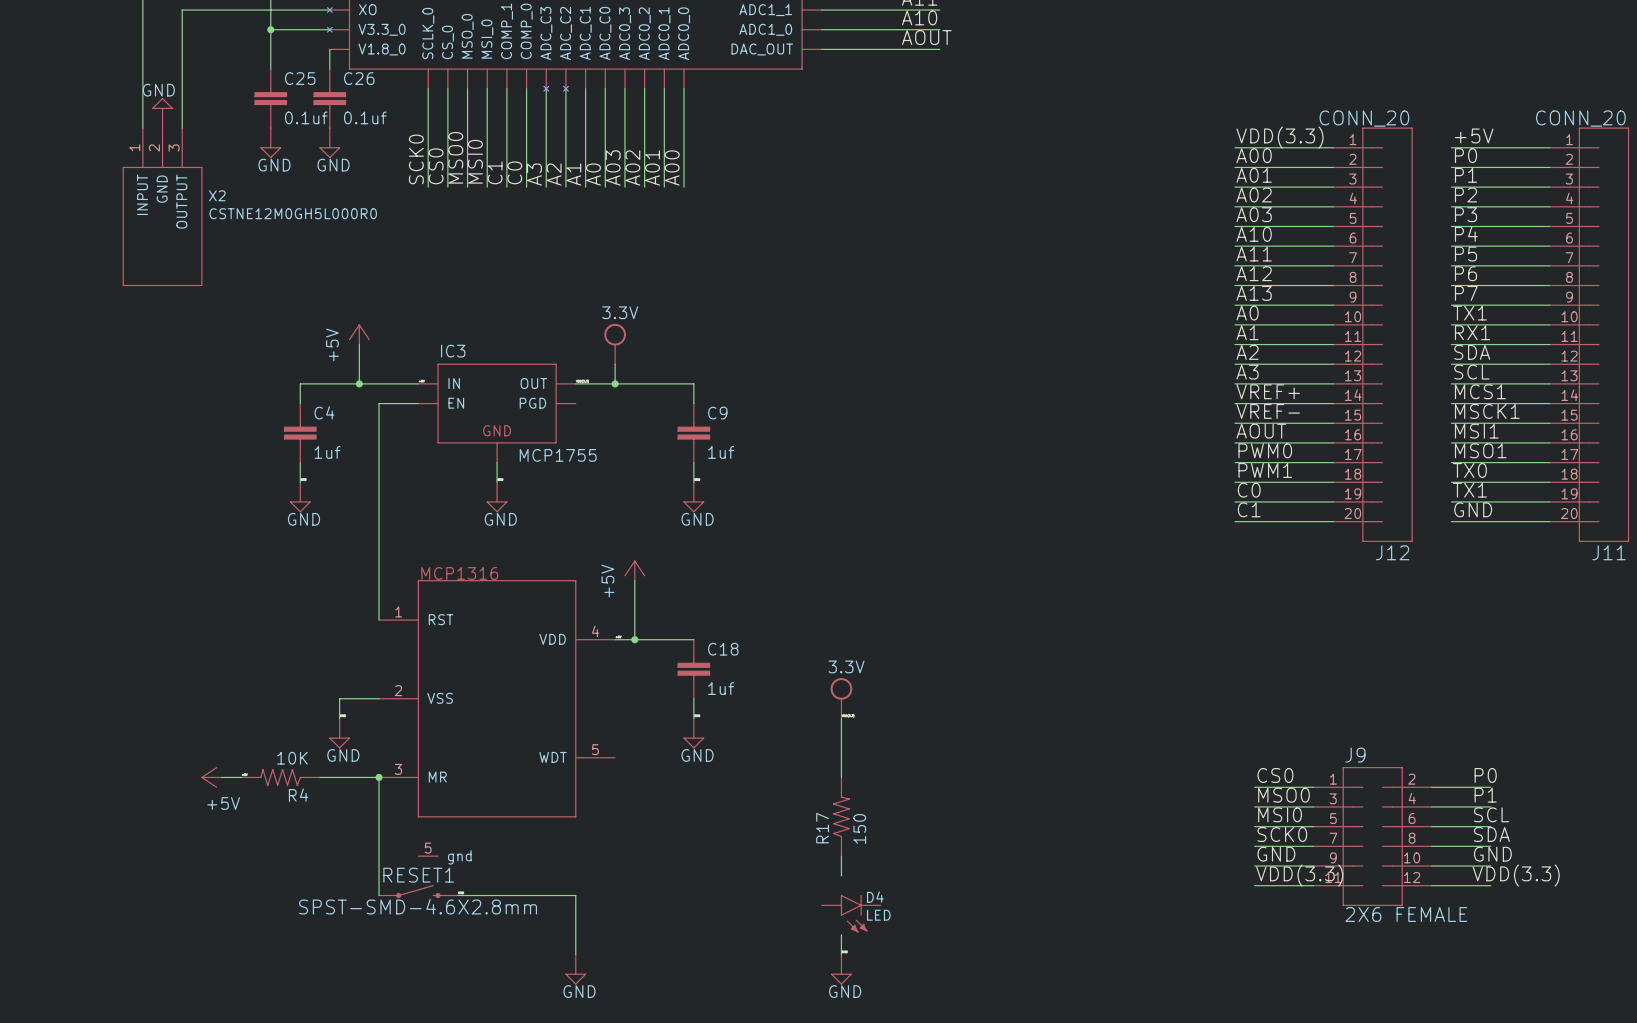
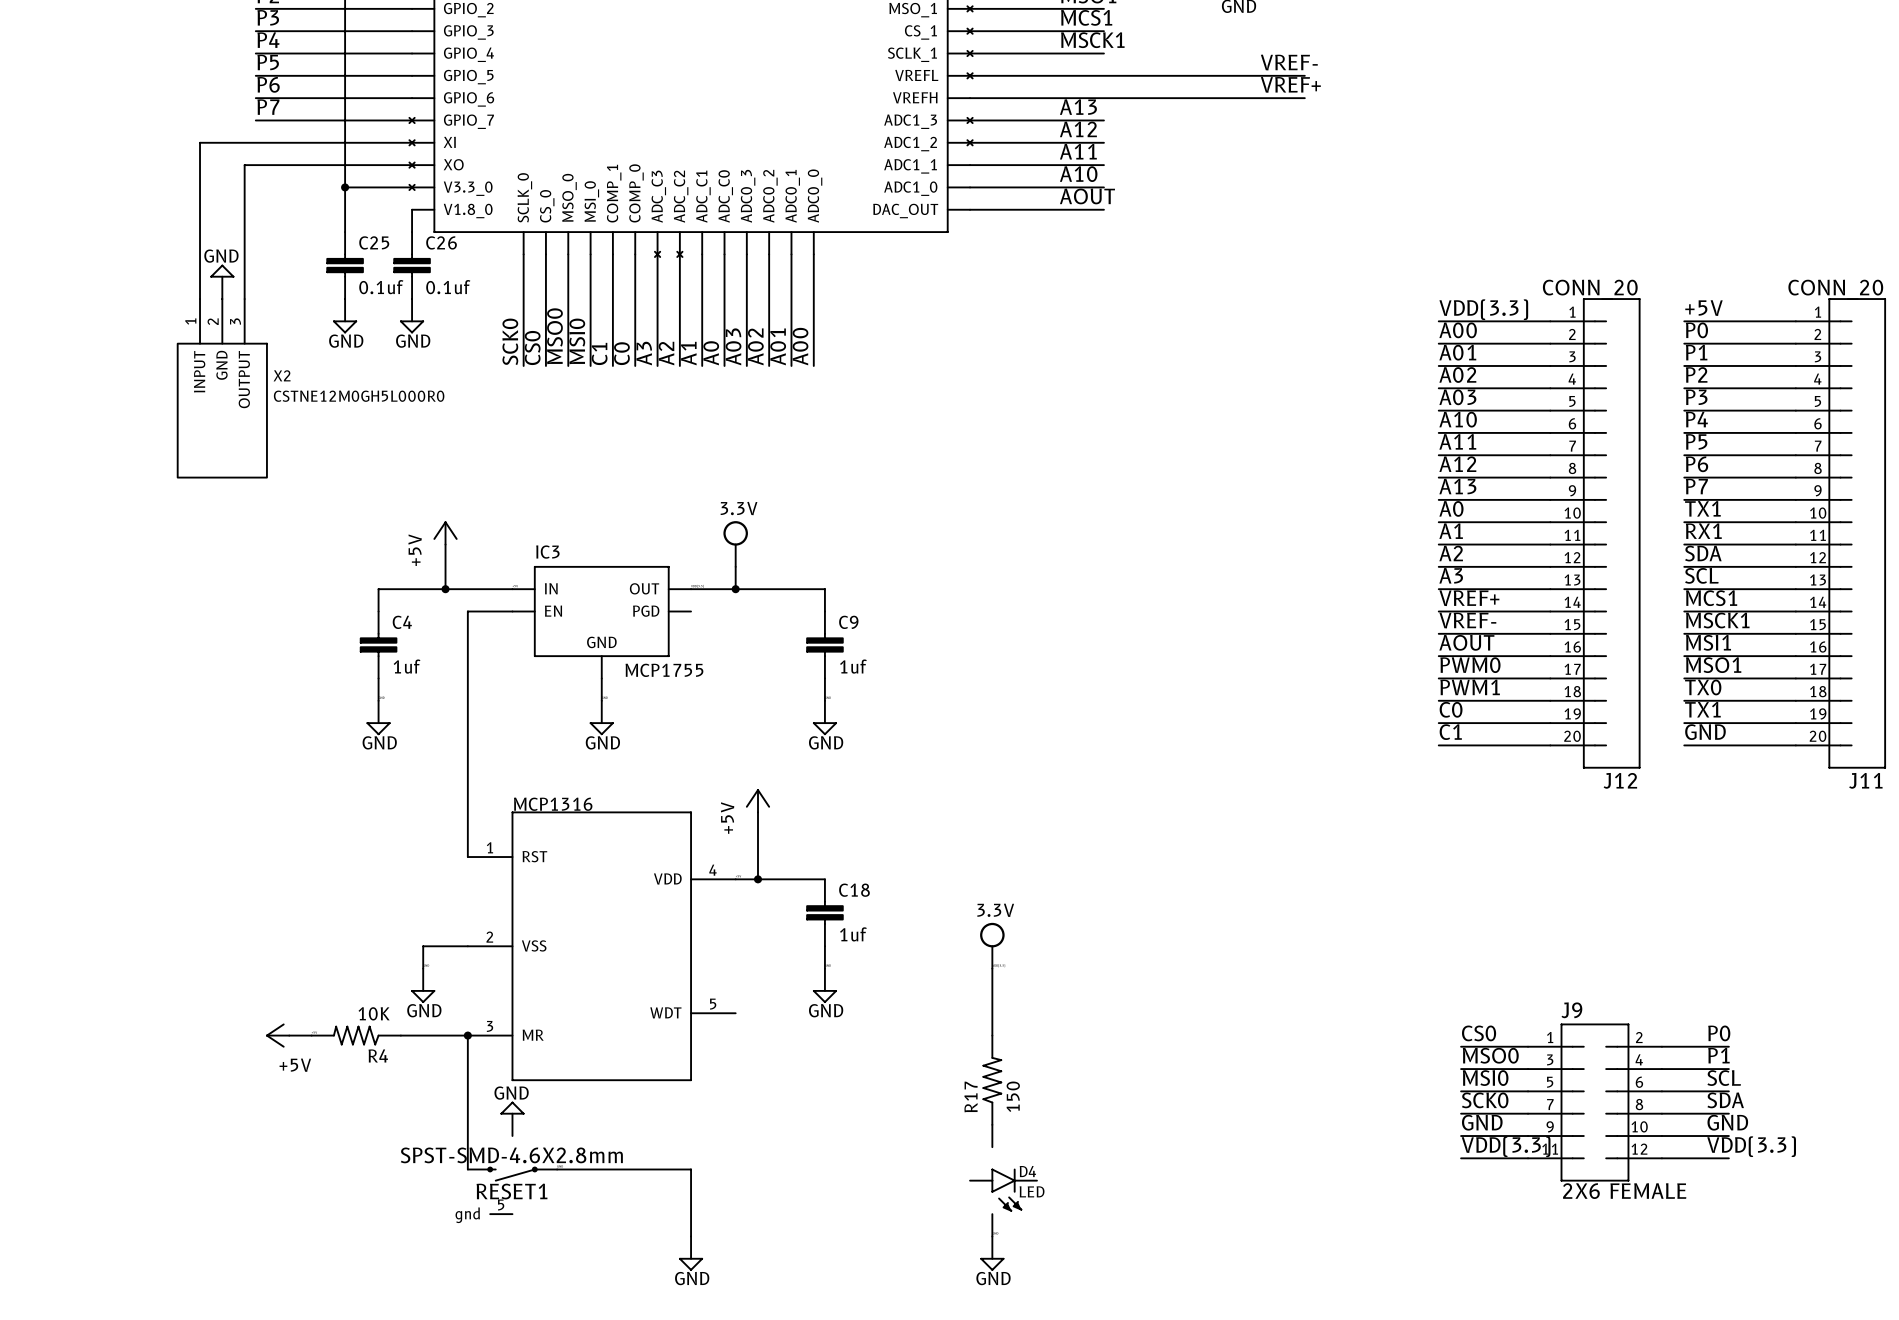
power symbol: none -> GND (512, 1119)
RESET1 rotation: 0° (418, 891) -> 180° (512, 1173)

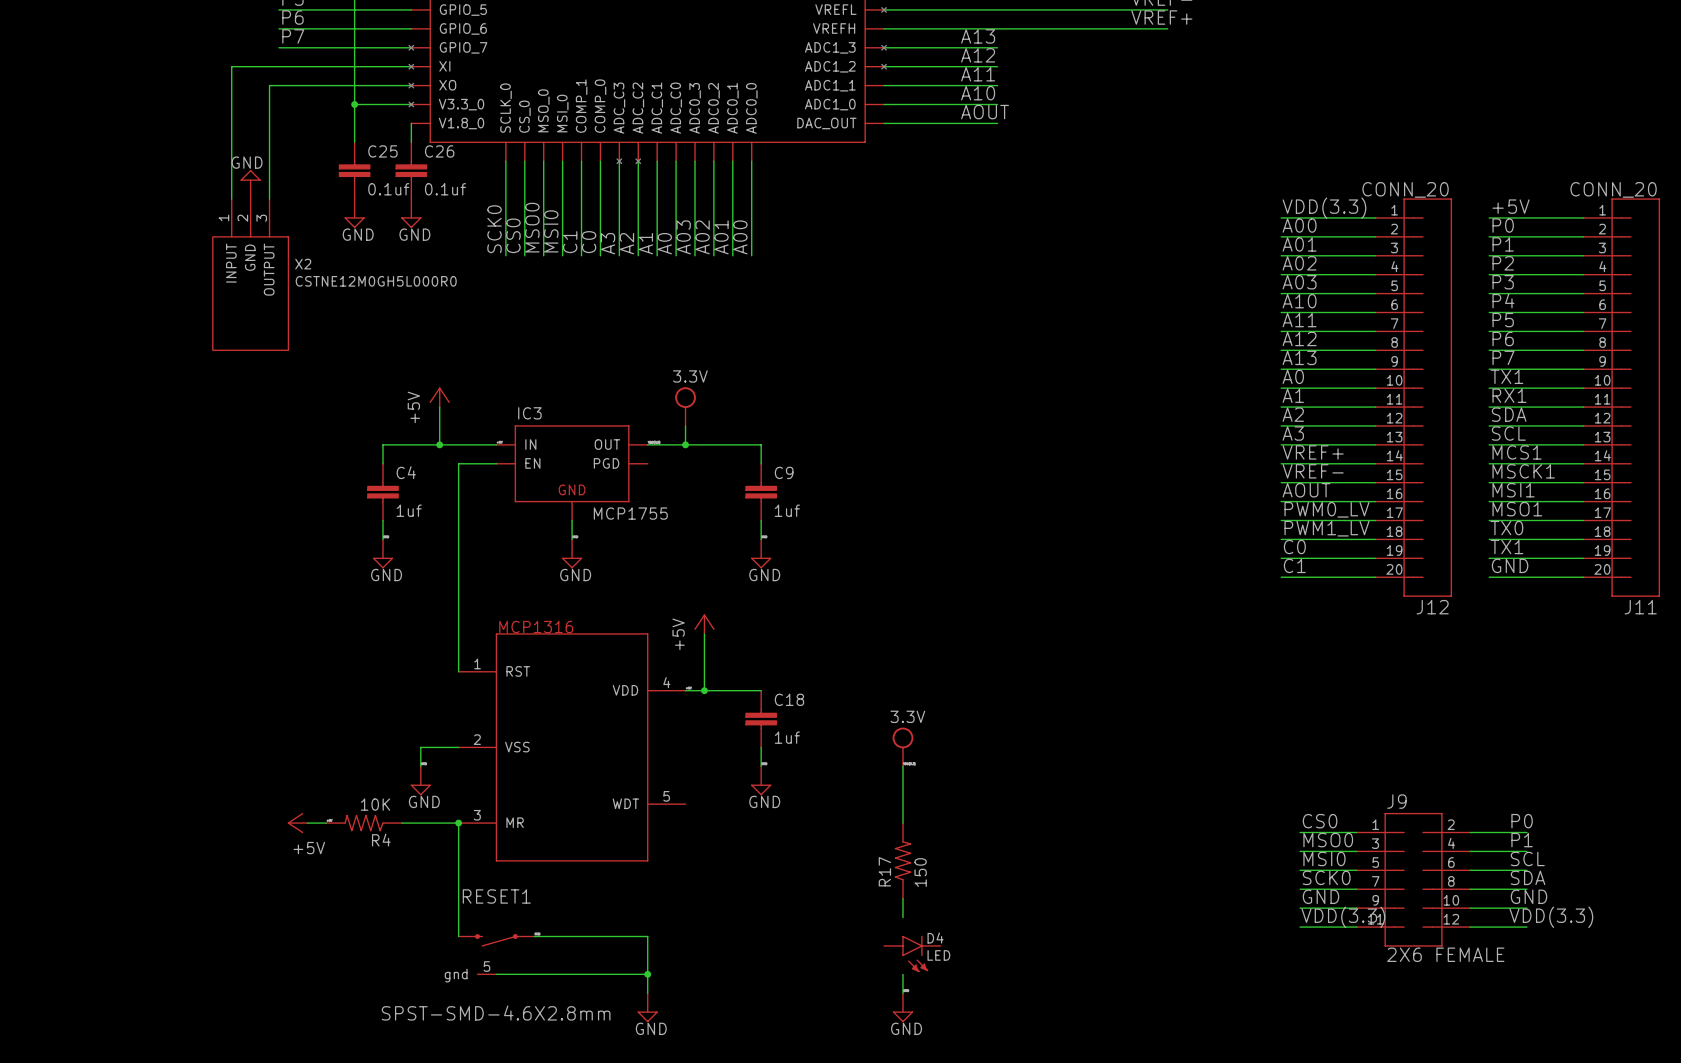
label: PWM0 (1470, 665) -> PWM0_LV (1326, 509)
label: PWM1 (1470, 687) -> PWM1_LV (1326, 528)
power symbol: GND (512, 1119) -> none
RESET1 value position: SPST-SMD-4.6X2.8mm (511, 1155) -> SPST-SMD-4.6X2.8mm (496, 1013)
RESET1 name position: RESET1 (511, 1191) -> RESET1 (496, 896)
wire: none -> (496, 974) (647, 974)
junction: none -> (647, 974)

